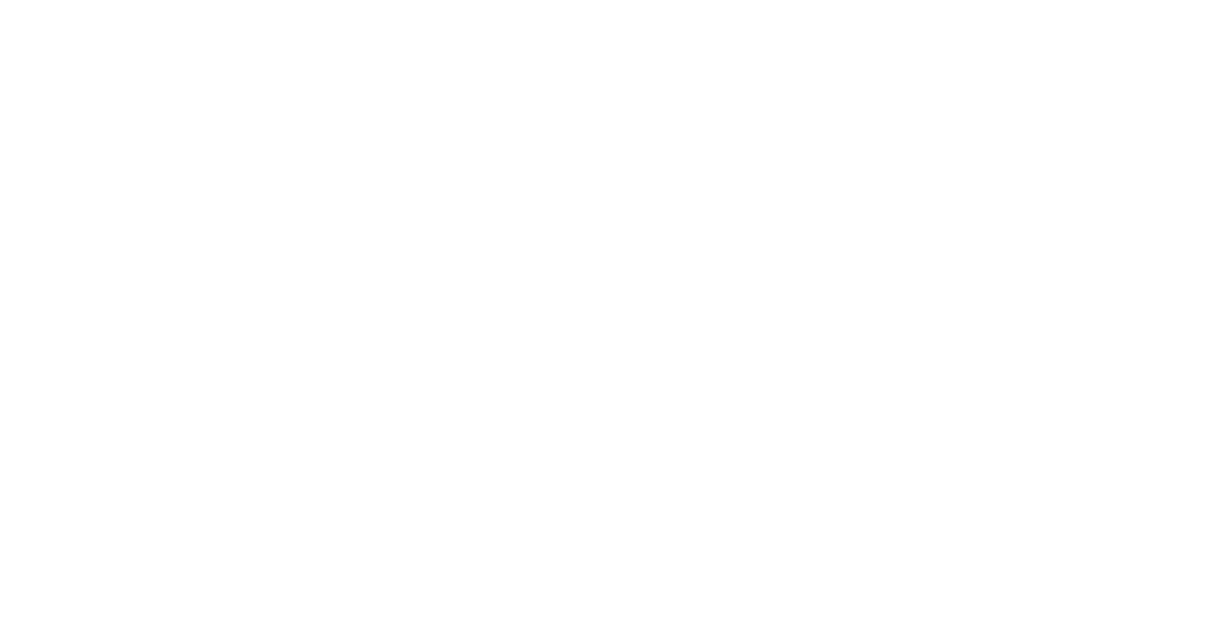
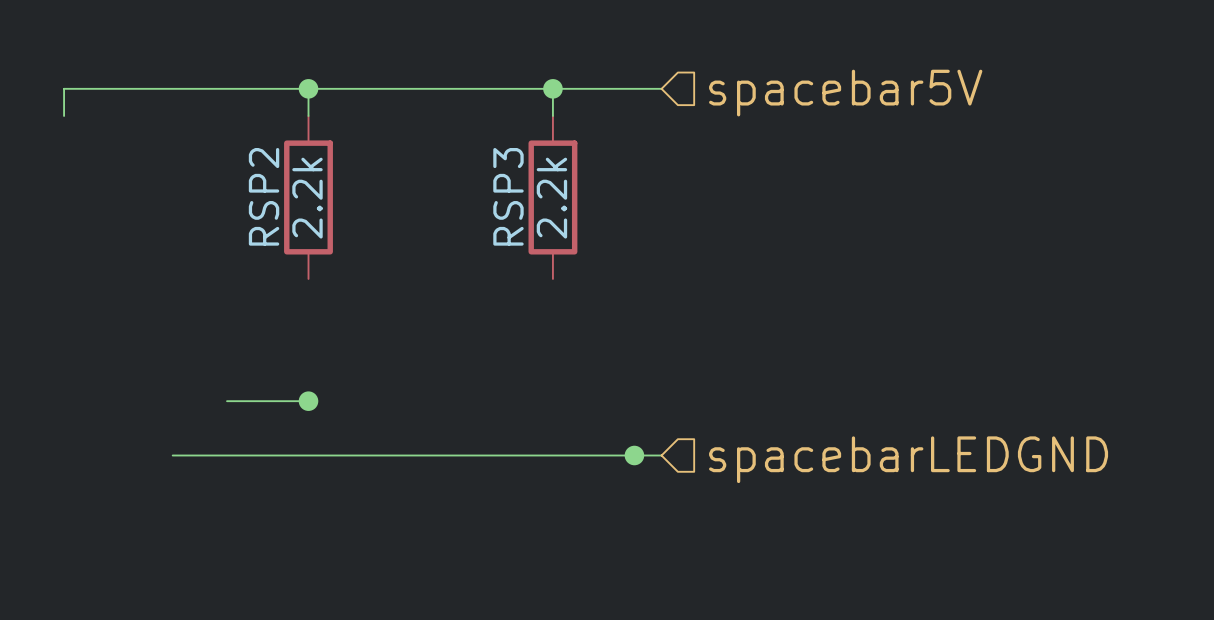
wire: none -> (308, 88) (308, 116)
junction: none -> (308, 88)
wire: none -> (552, 88) (552, 116)
junction: none -> (552, 88)
wire: none -> (661, 88) (64, 88) (64, 116)
hierarchical label: none -> spacebar5V (845, 93)
RSP2: none -> 2.2k (308, 197)
RSP3: none -> 2.2k (552, 197)
wire: none -> (227, 401) (308, 401)
junction: none -> (308, 401)
wire: none -> (172, 455) (661, 455)
junction: none -> (634, 455)
hierarchical label: none -> spacebarLEDGND (908, 459)

